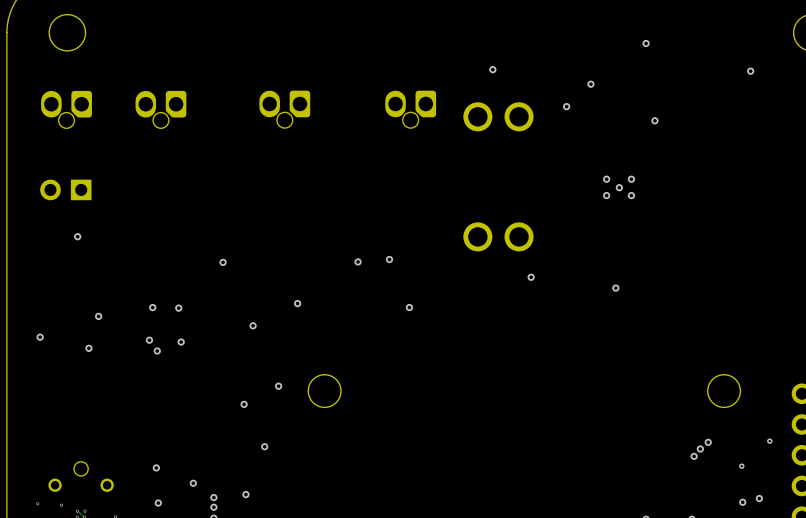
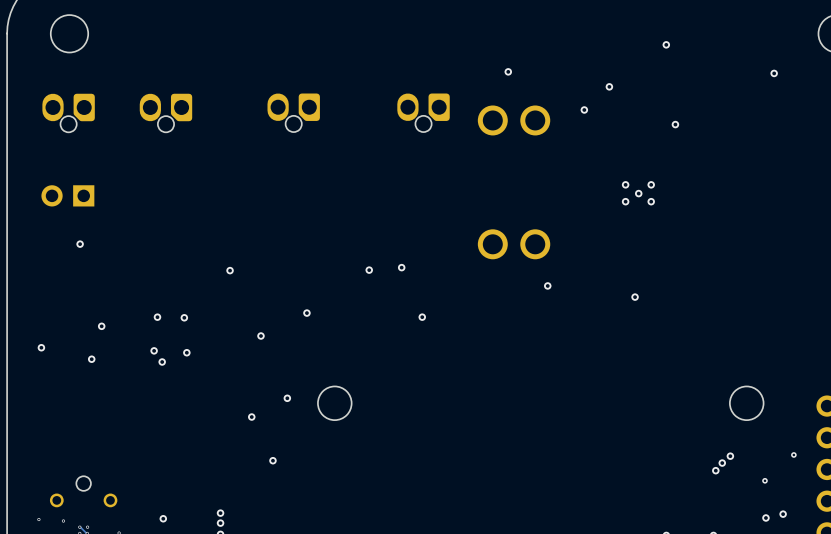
via: (156, 467) -> none
via: (193, 483) -> none
via: (245, 494) -> none

